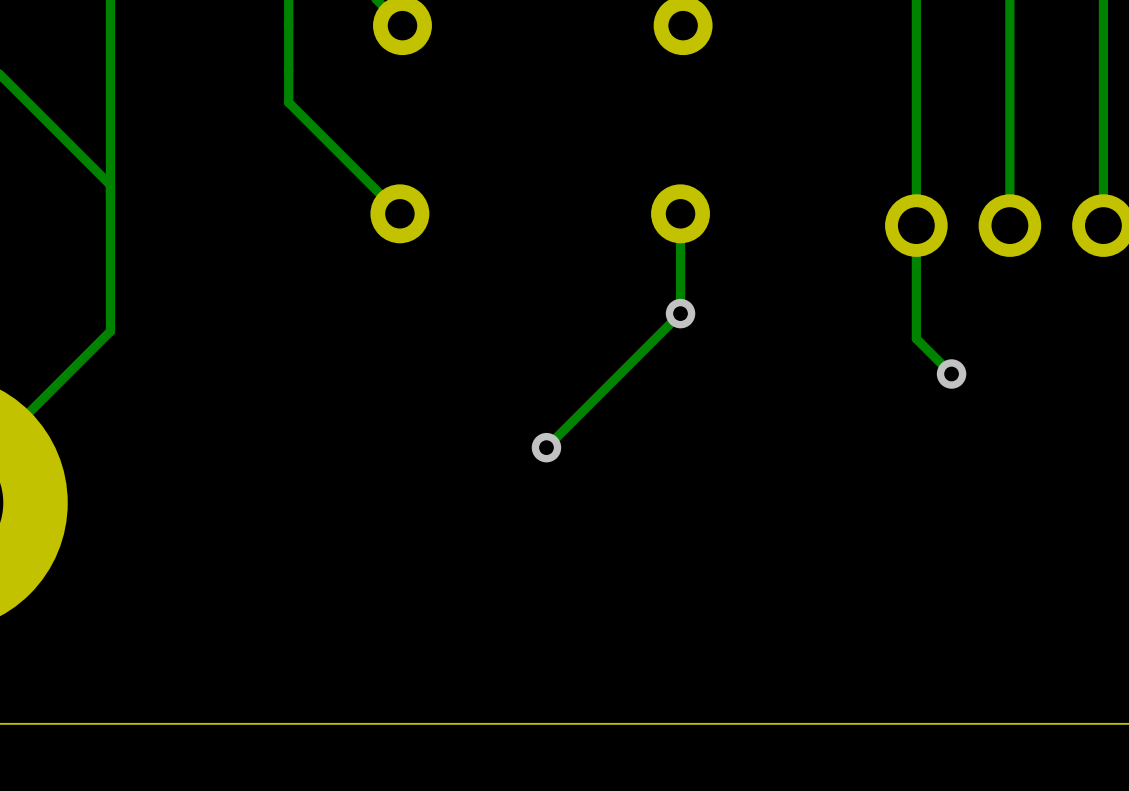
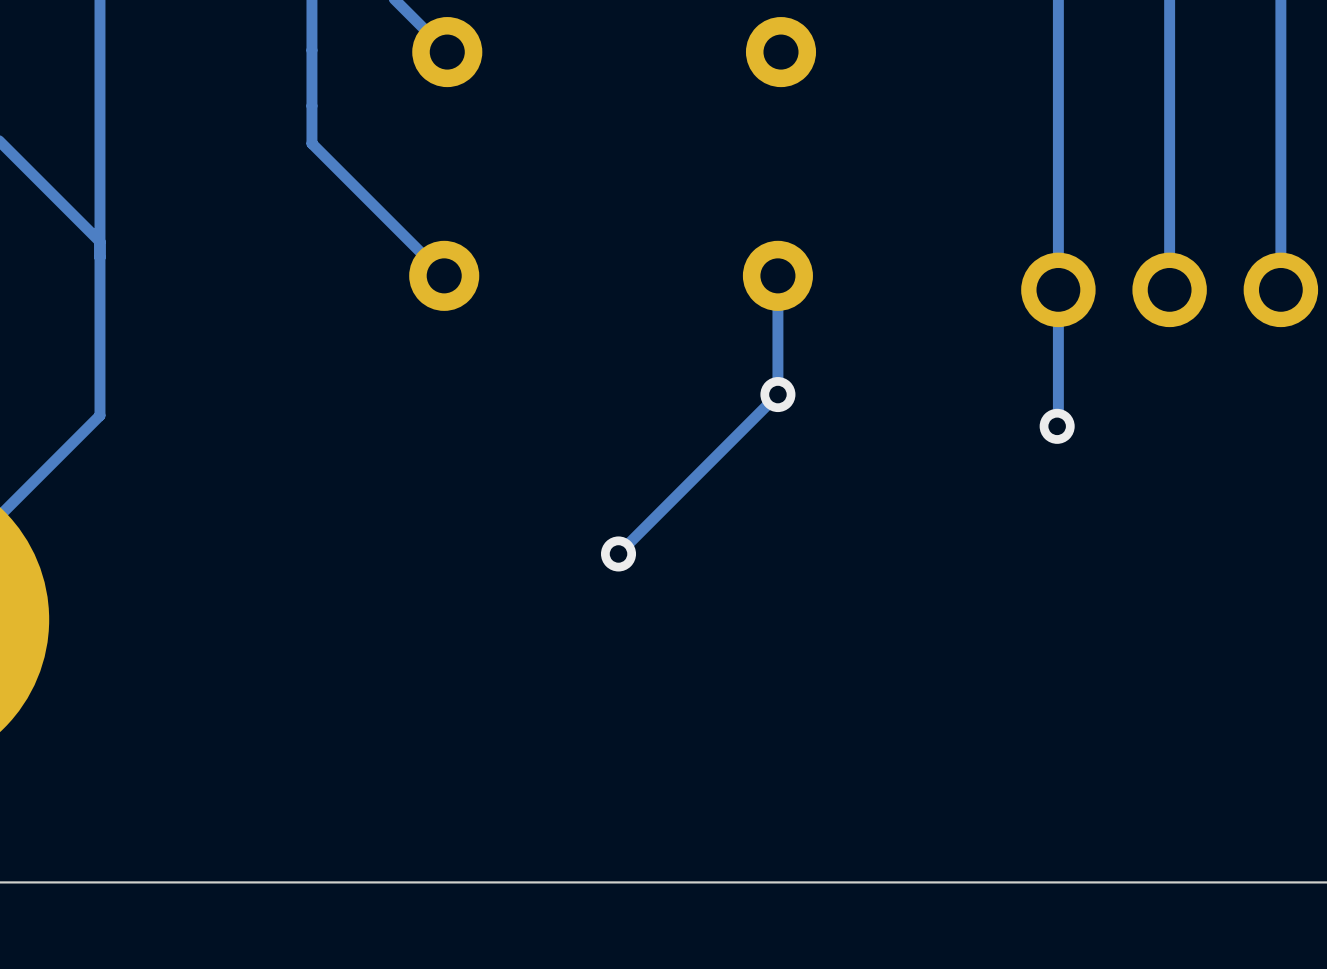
track: (916, 338) (951, 374) -> none
via position: (951, 374) -> (1057, 426)

